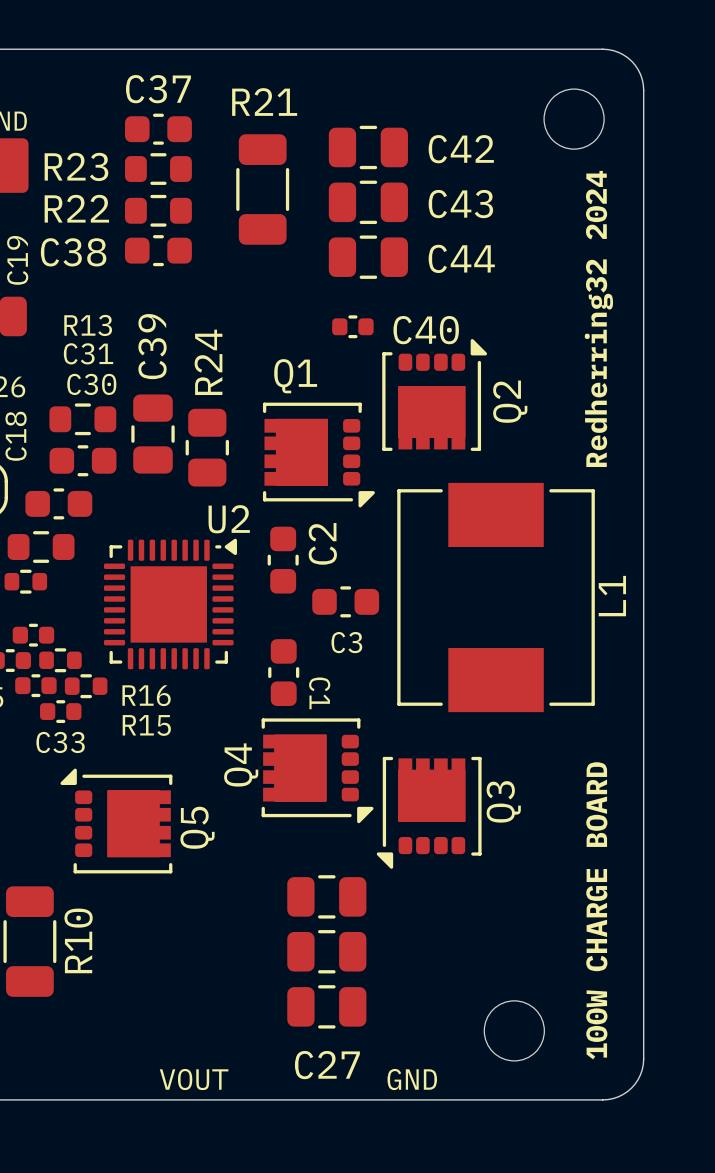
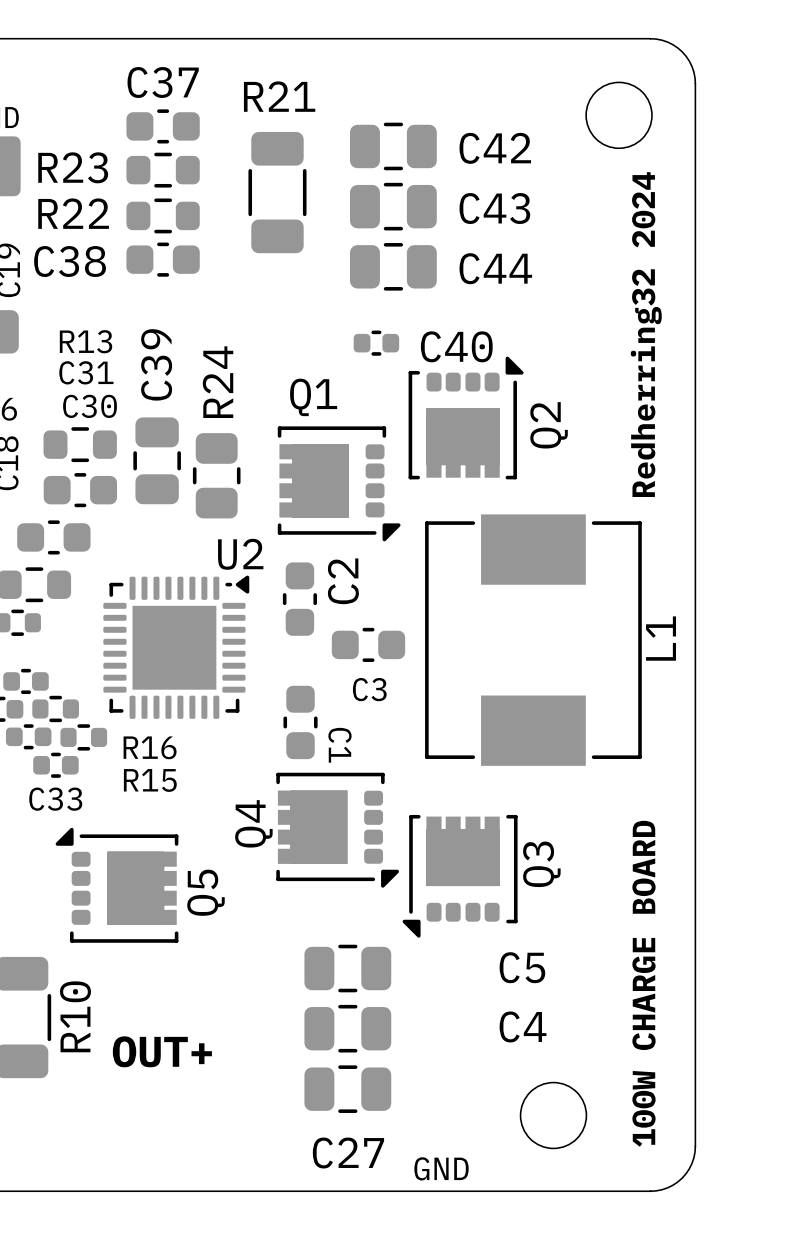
C5 name: none -> C5 (522, 967)
C4 name: none -> C4 (523, 1026)
text: none -> OUT+ (162, 1051)
text: VOUT (194, 1079) -> none

